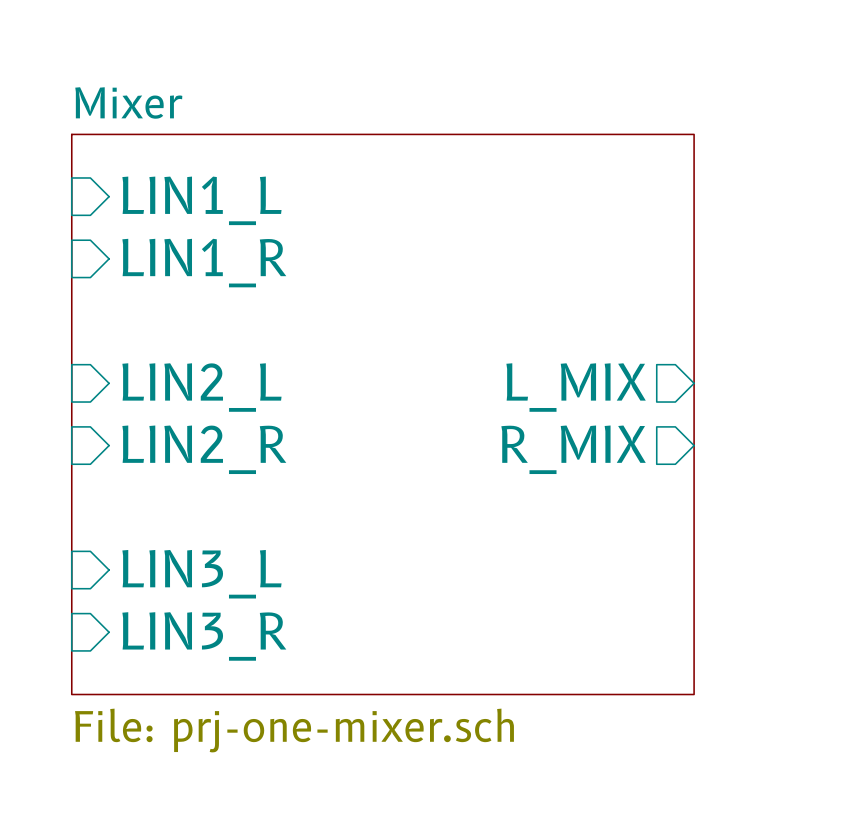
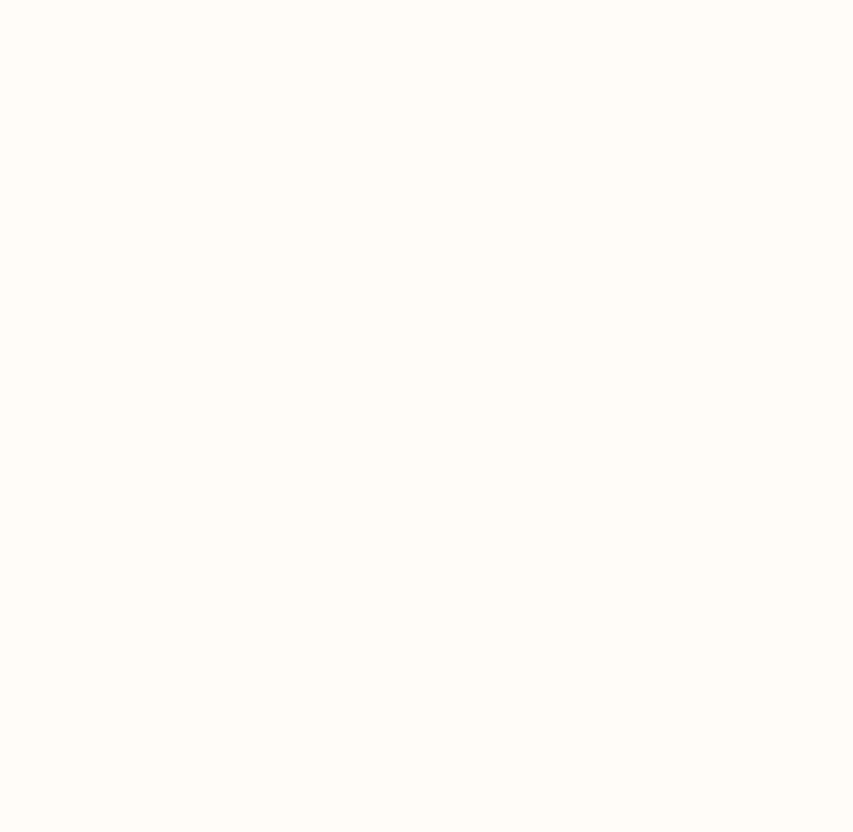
sheet pin: LIN1_L (201, 200) -> none
sheet pin: LIN1_R (204, 263) -> none
sheet pin: LIN2_L (201, 387) -> none
sheet pin: L_MIX (576, 387) -> none
sheet Mixer: File: prj-one-mixer.sch (382, 414) -> none
sheet pin: LIN2_R (204, 449) -> none
sheet pin: R_MIX (573, 449) -> none
sheet pin: LIN3_L (201, 574) -> none
sheet pin: LIN3_R (204, 636) -> none

